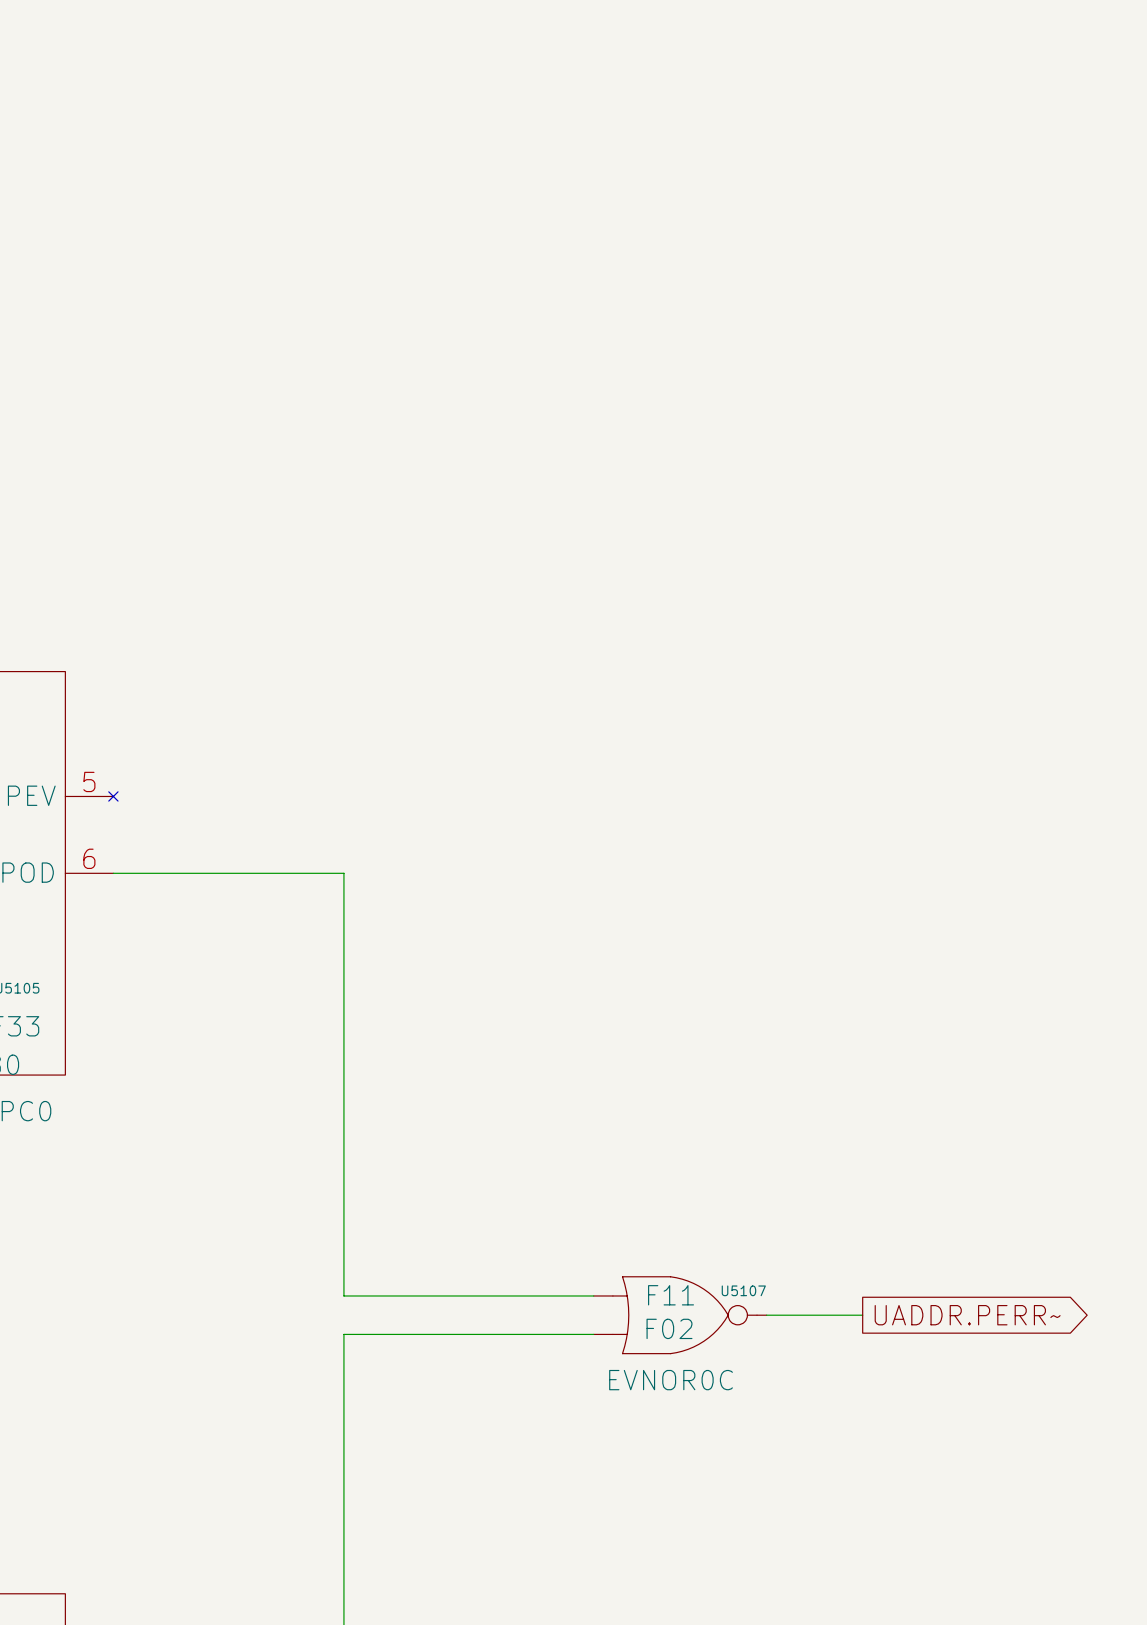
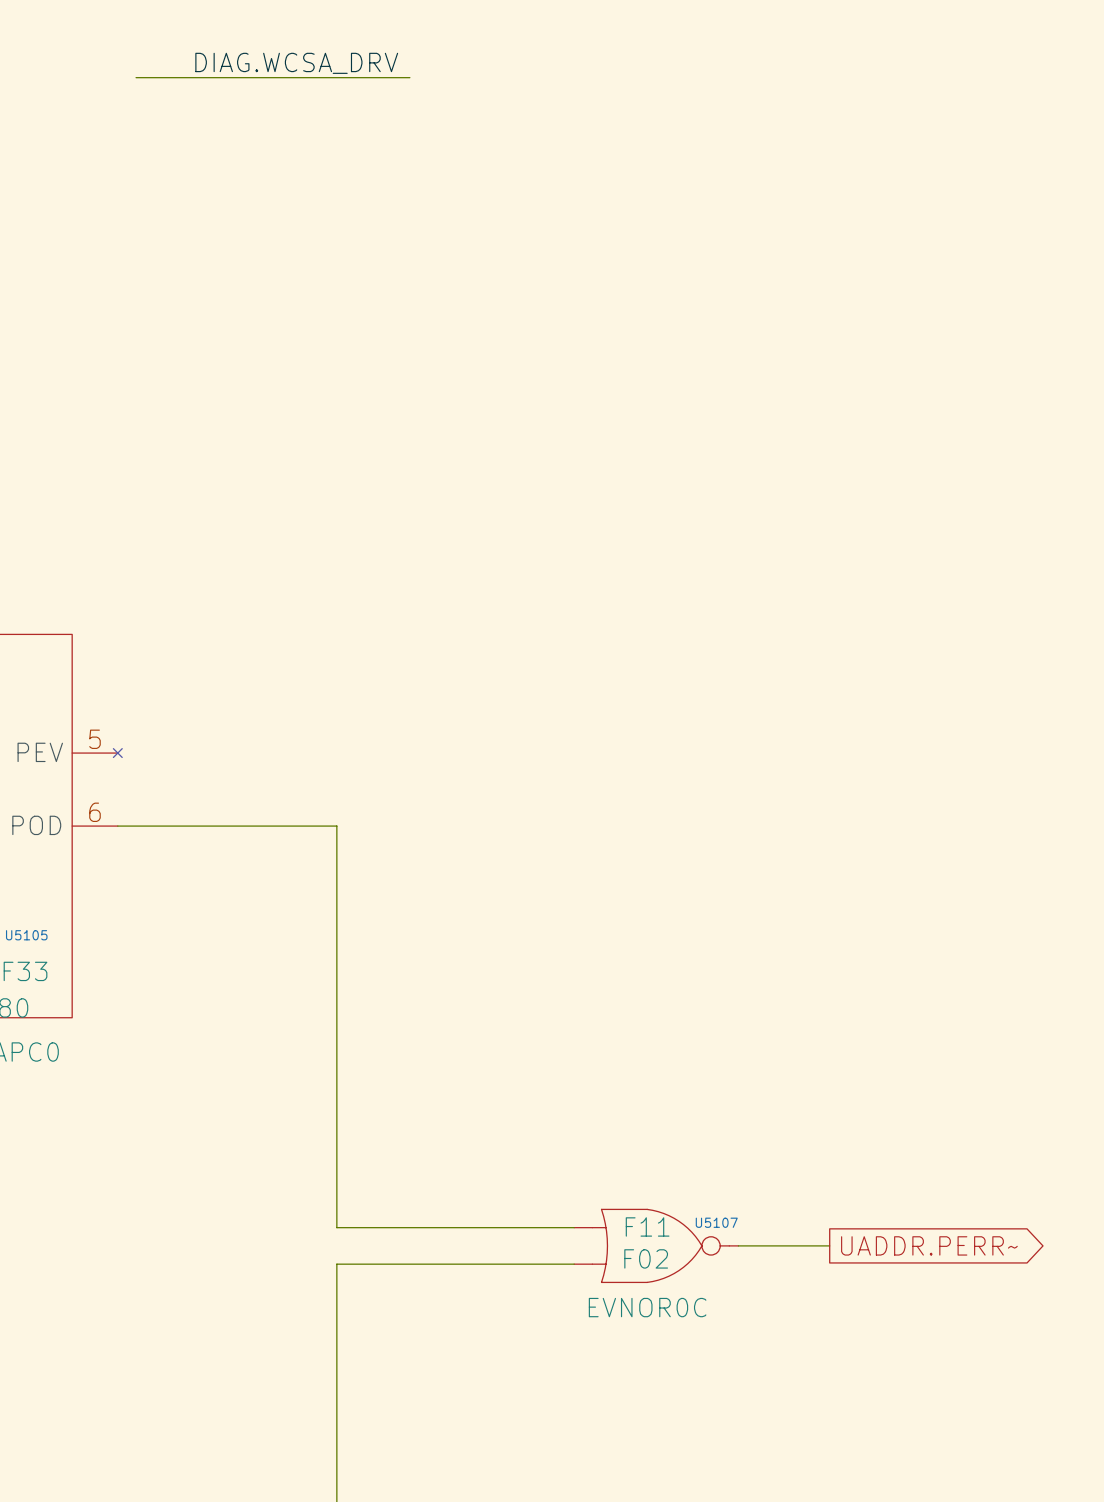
label: none -> DIAG.WCSA_DRV (296, 63)
wire: none -> (136, 77) (409, 77)

